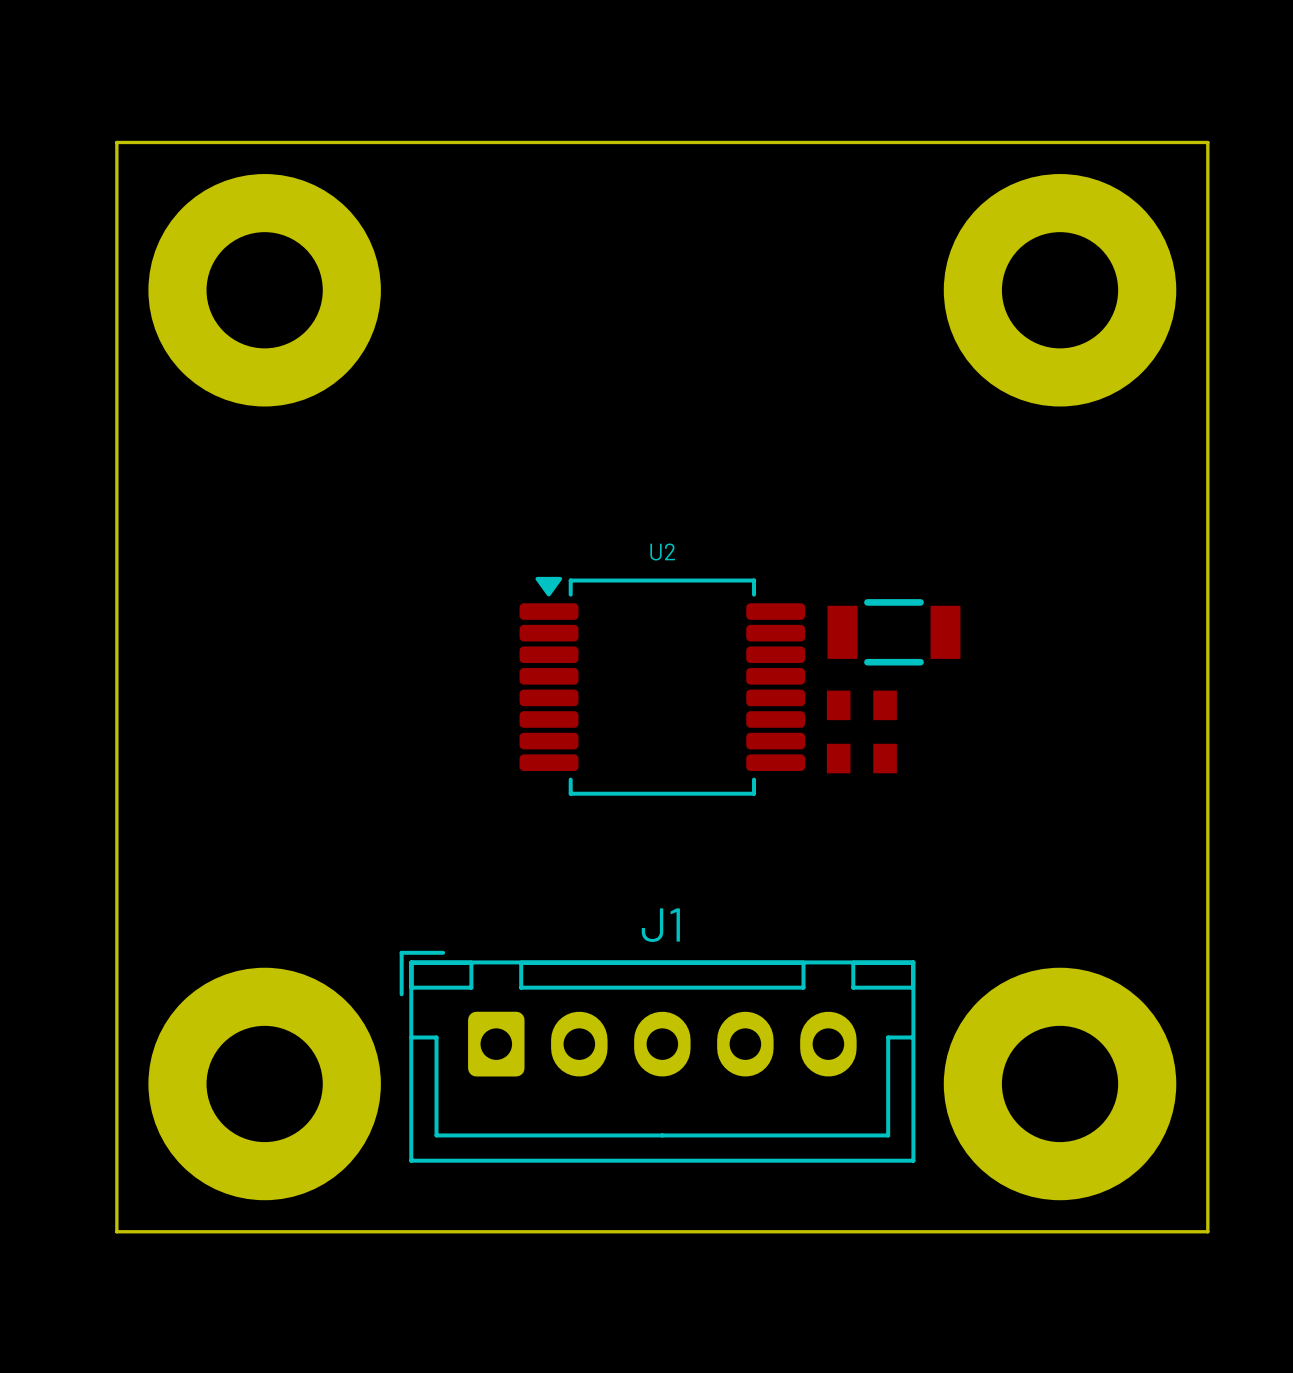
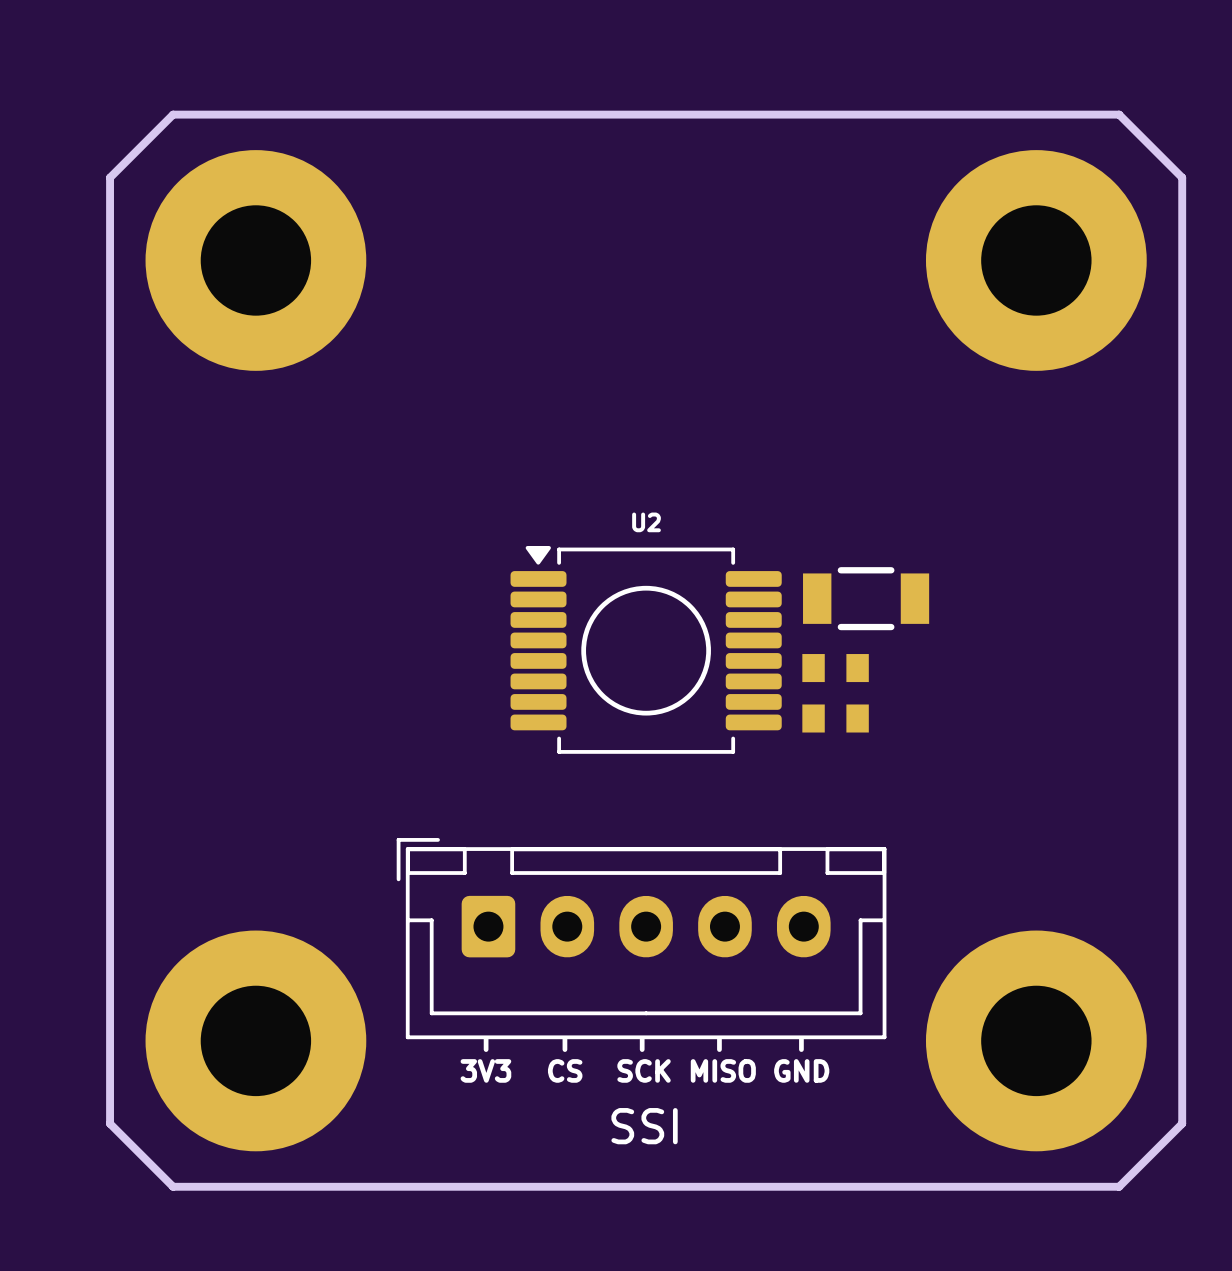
board edge: (116, 142) (1207, 142) (1207, 1231) (116, 1231) (116, 142) -> (173, 114) (110, 177) (110, 1123) (173, 1186) (1119, 1186) (1182, 1123) (1182, 177) (1119, 114) (173, 114)
part position: (264, 290) -> (255, 260)
part position: (1060, 290) -> (1036, 260)
drawing: none -> [581, 585, 711, 716]
part: none -> (641, 938)
J1: (657, 1056) -> none
part position: (264, 1083) -> (255, 1040)
part position: (1060, 1083) -> (1036, 1040)
line: none -> (486, 1038) (486, 1049)
line: none -> (564, 1038) (564, 1049)
line: none -> (642, 1038) (642, 1049)
line: none -> (719, 1038) (719, 1049)
line: none -> (801, 1038) (801, 1049)
text: none -> 3V3 (485, 1070)
text: none -> CS (565, 1070)
text: none -> SCK (644, 1070)
text: none -> MISO (723, 1070)
text: none -> GND (801, 1070)
text: none -> SSI (644, 1126)

